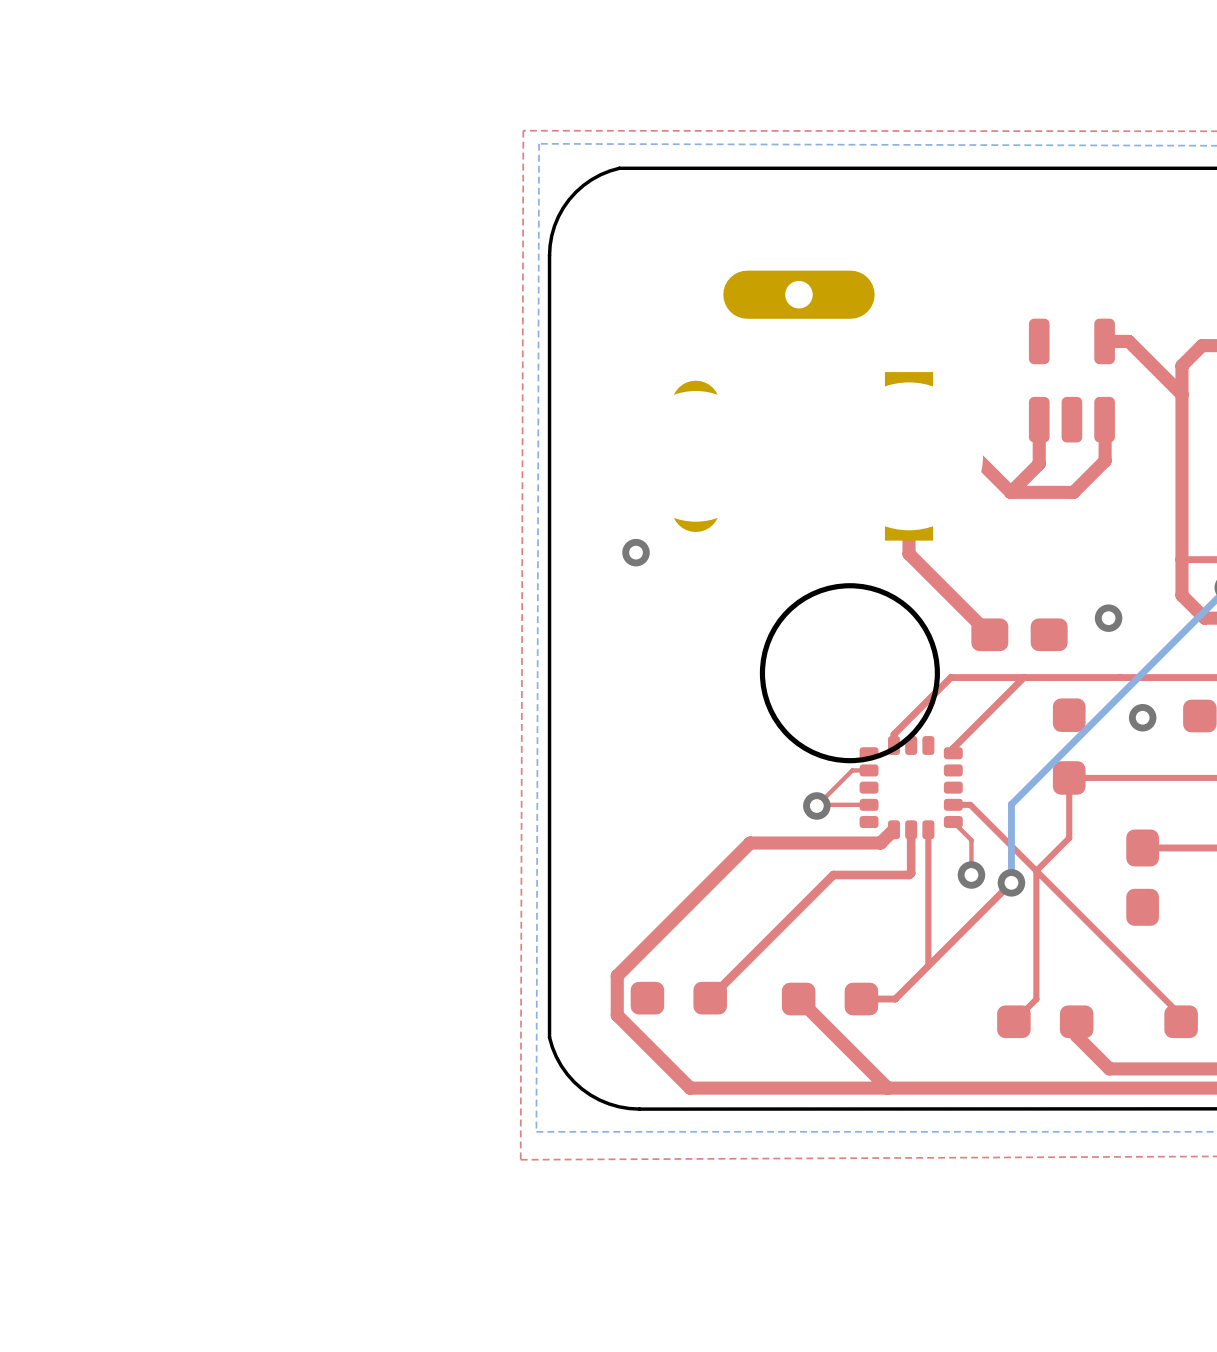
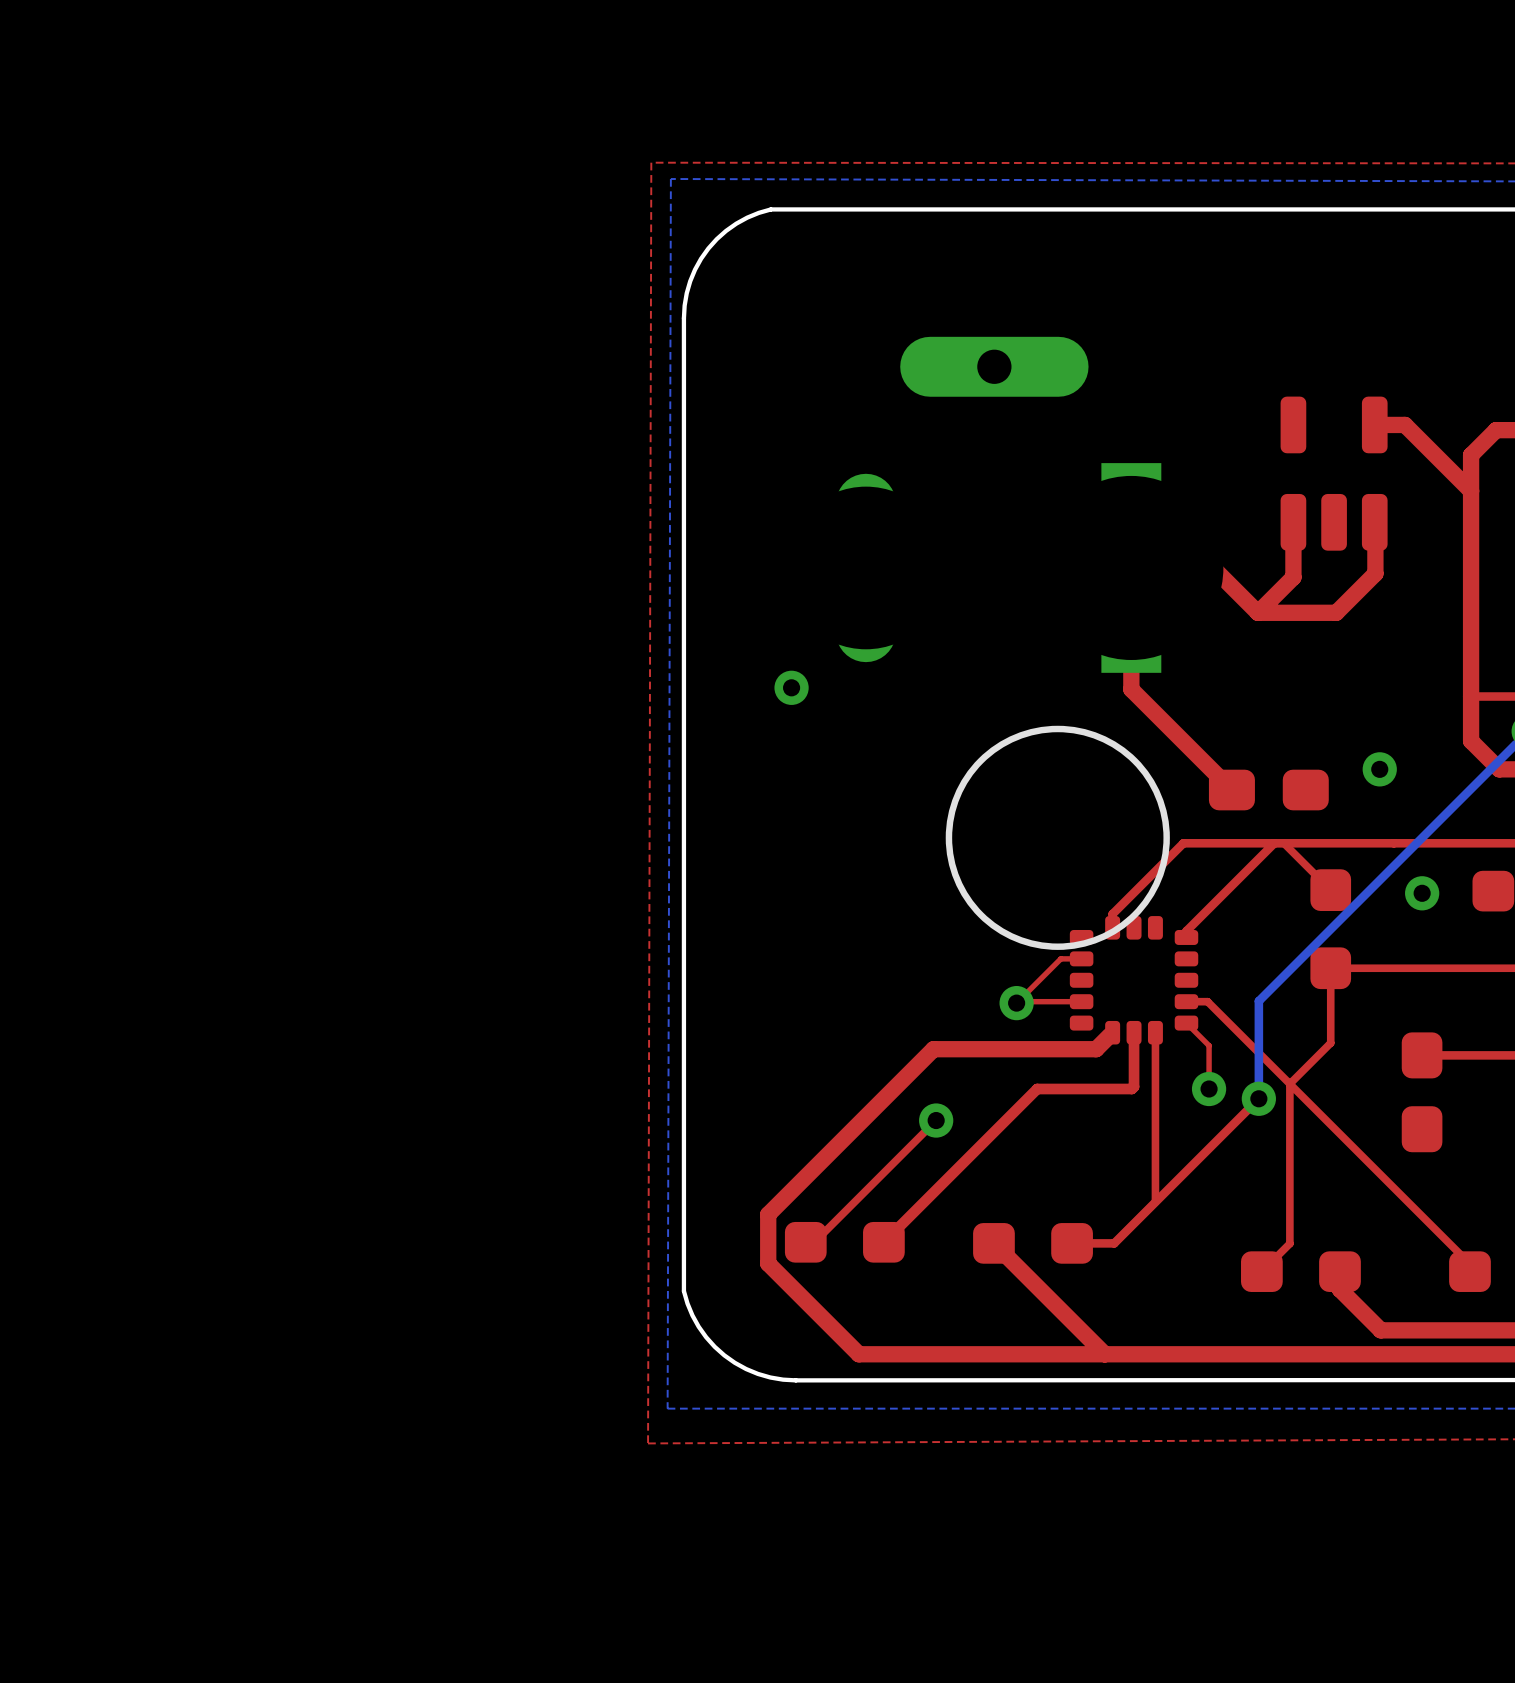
top track: none -> (1274, 843) (1283, 843) (1330, 890)
top track: none -> (936, 1120) (814, 1242) (805, 1242)
via: none -> (936, 1120)

